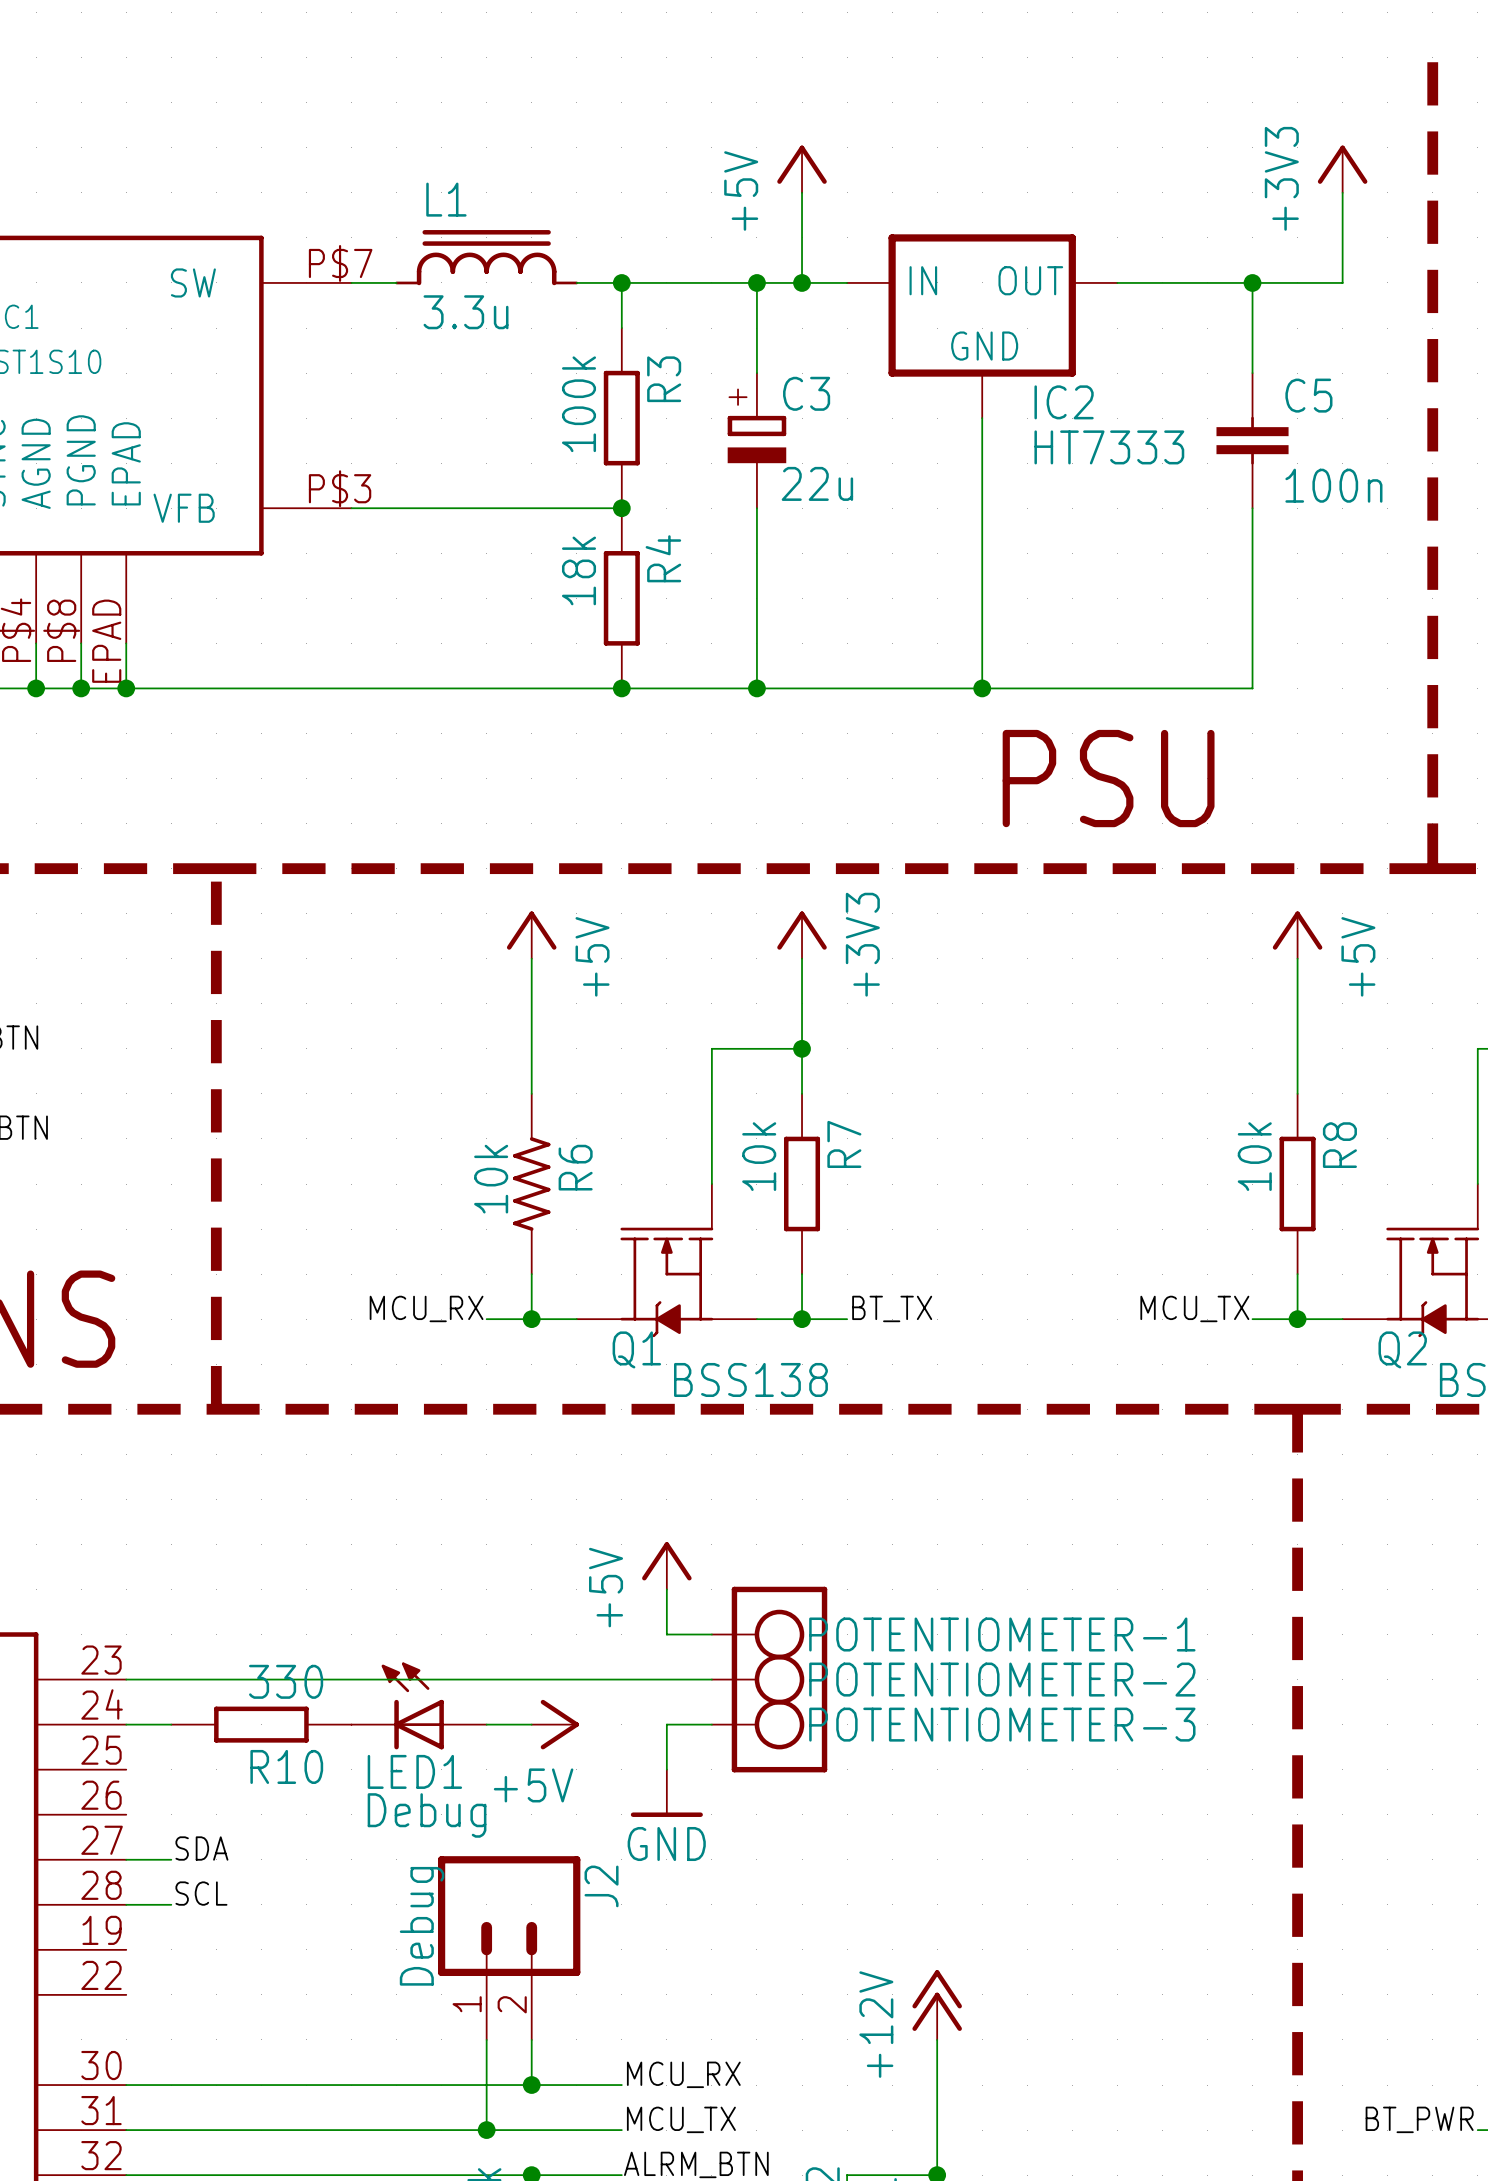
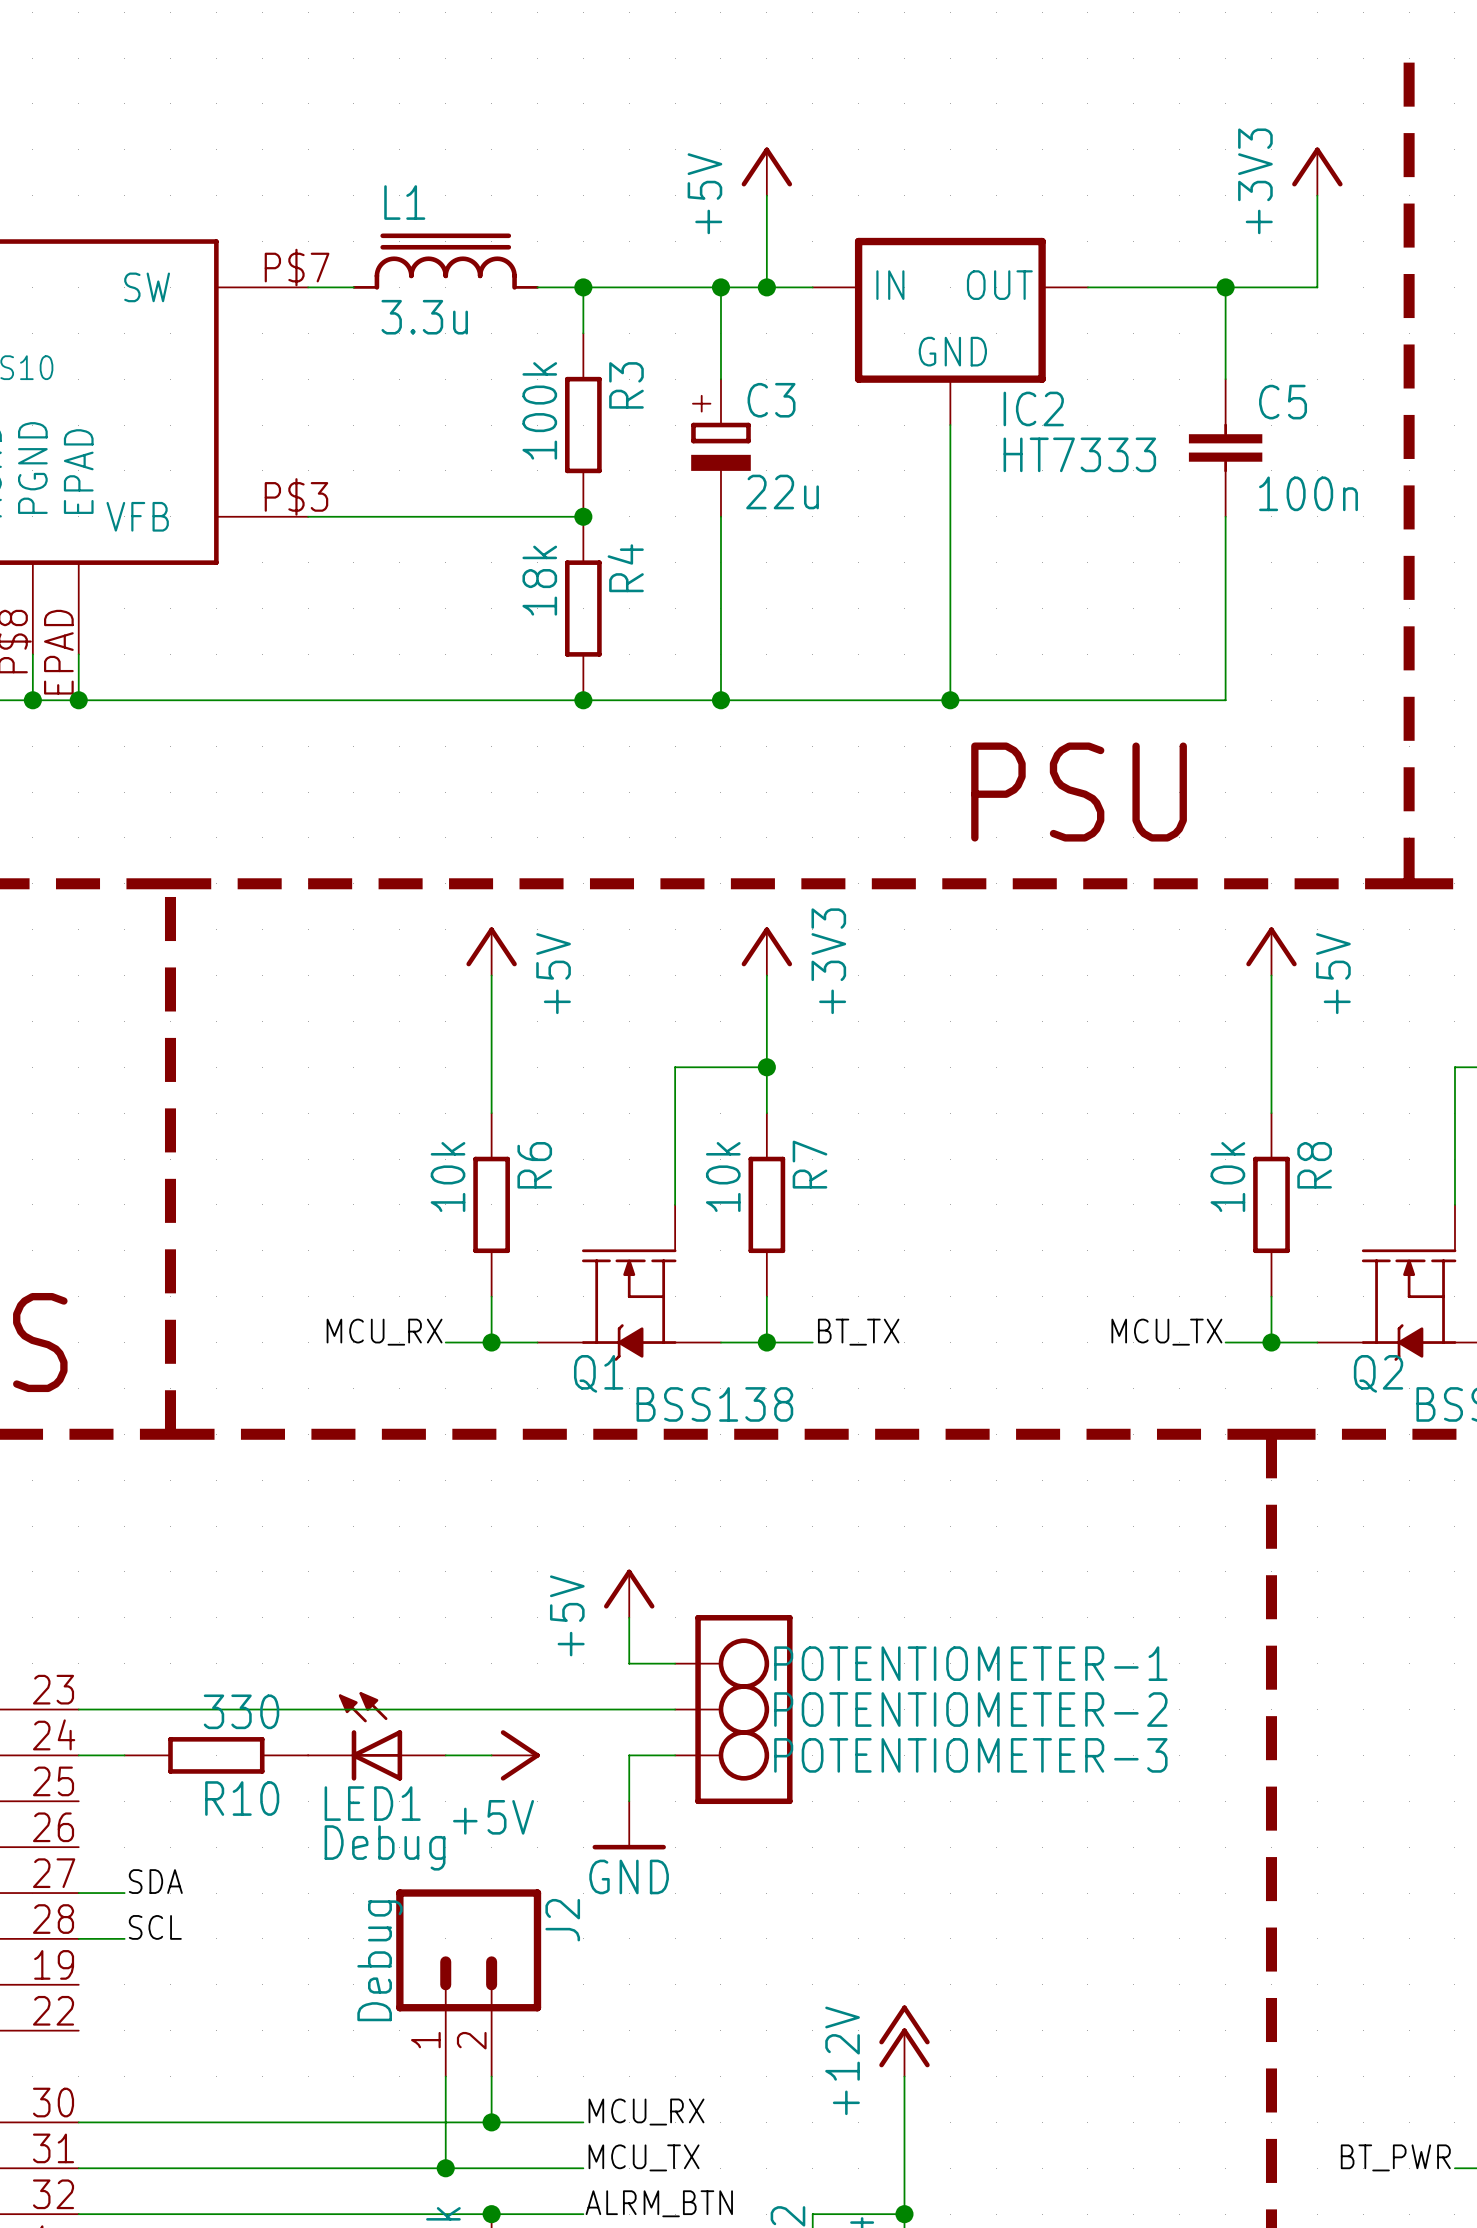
R6 symbol: [513, 1093, 551, 1275] -> [473, 1113, 510, 1297]
R6 name position: R6 (575, 1167) -> R6 (534, 1165)
R6 value position: 10k (491, 1179) -> 10k (448, 1177)

